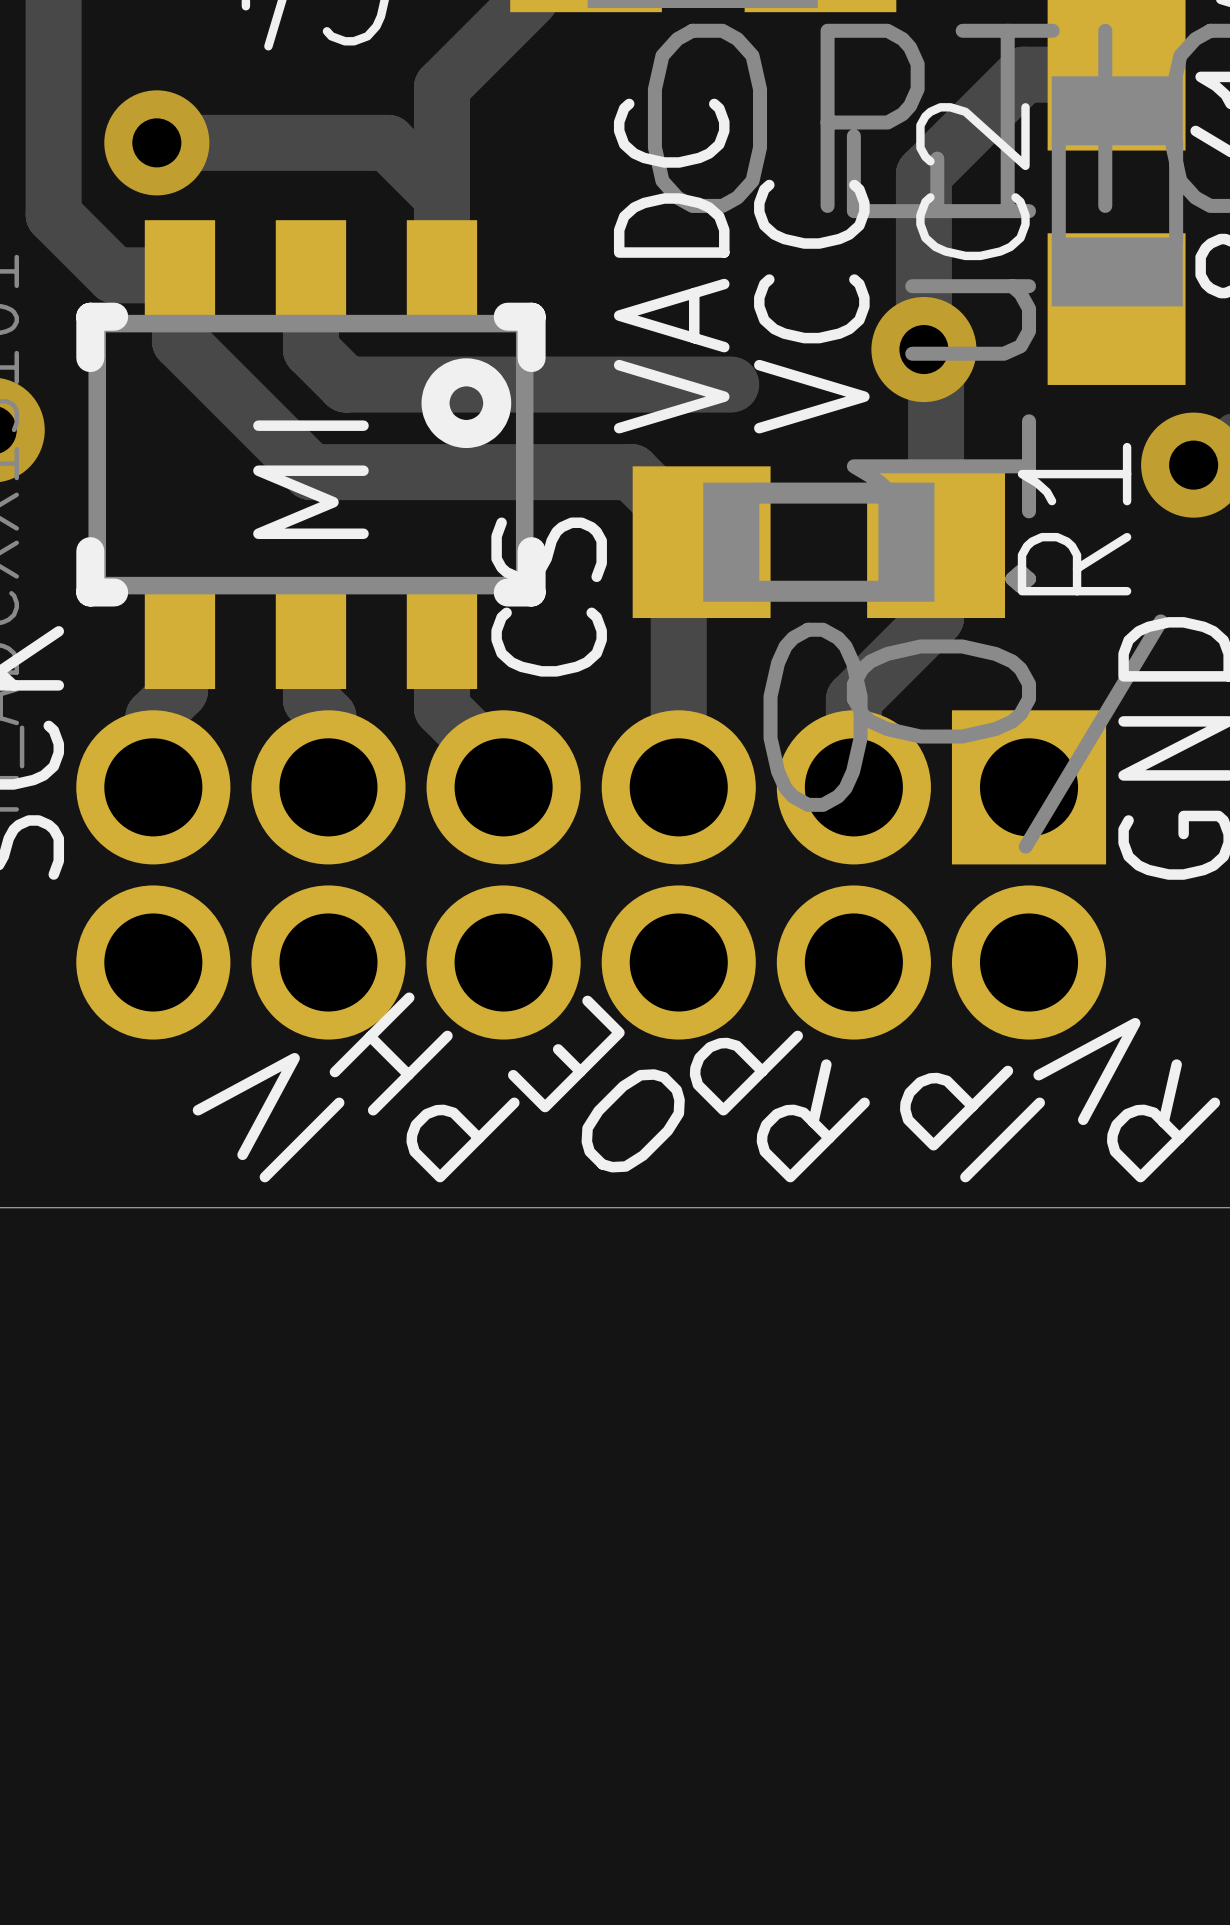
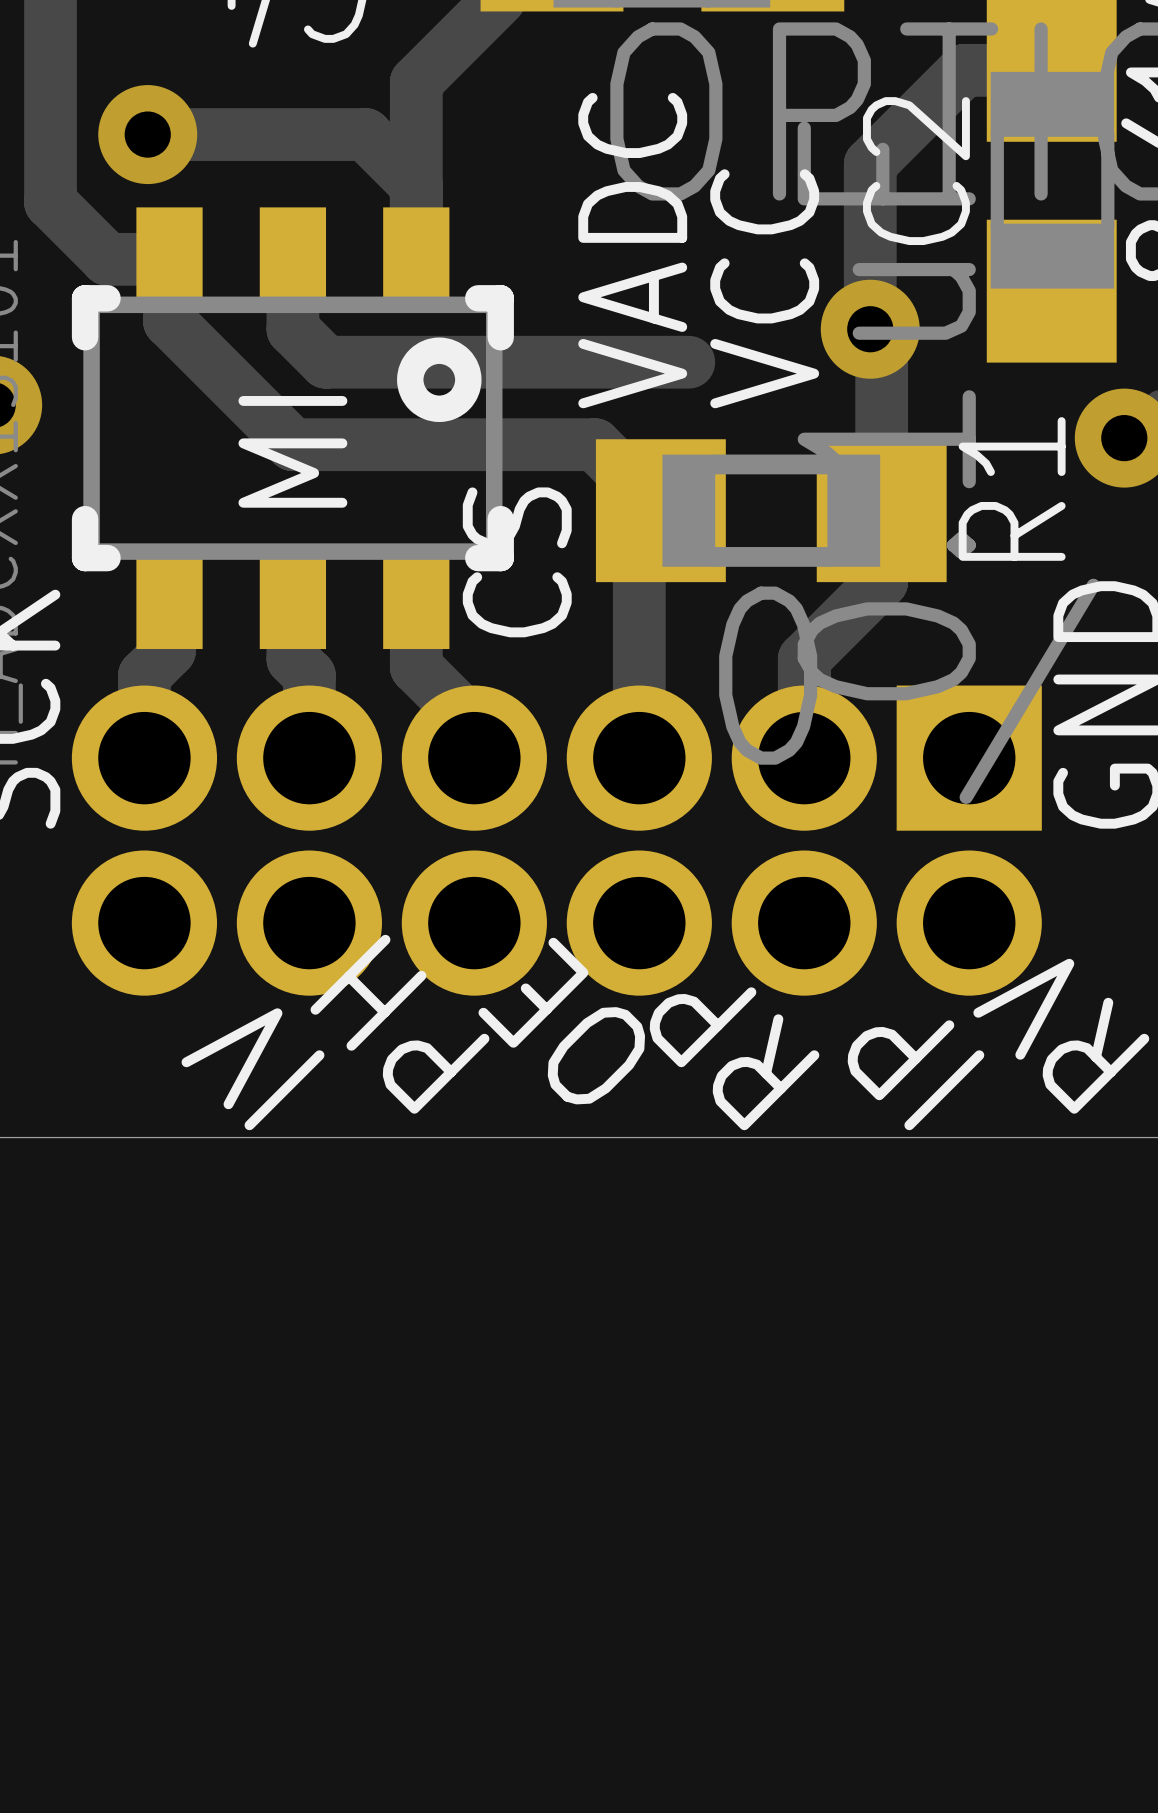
part position: (591, 874) -> (556, 840)
text position: RP (779, 1106) -> RP (734, 1058)
text position: IV (268, 1117) -> IV (252, 1069)
text position: IP (972, 1124) -> IP (916, 1075)

